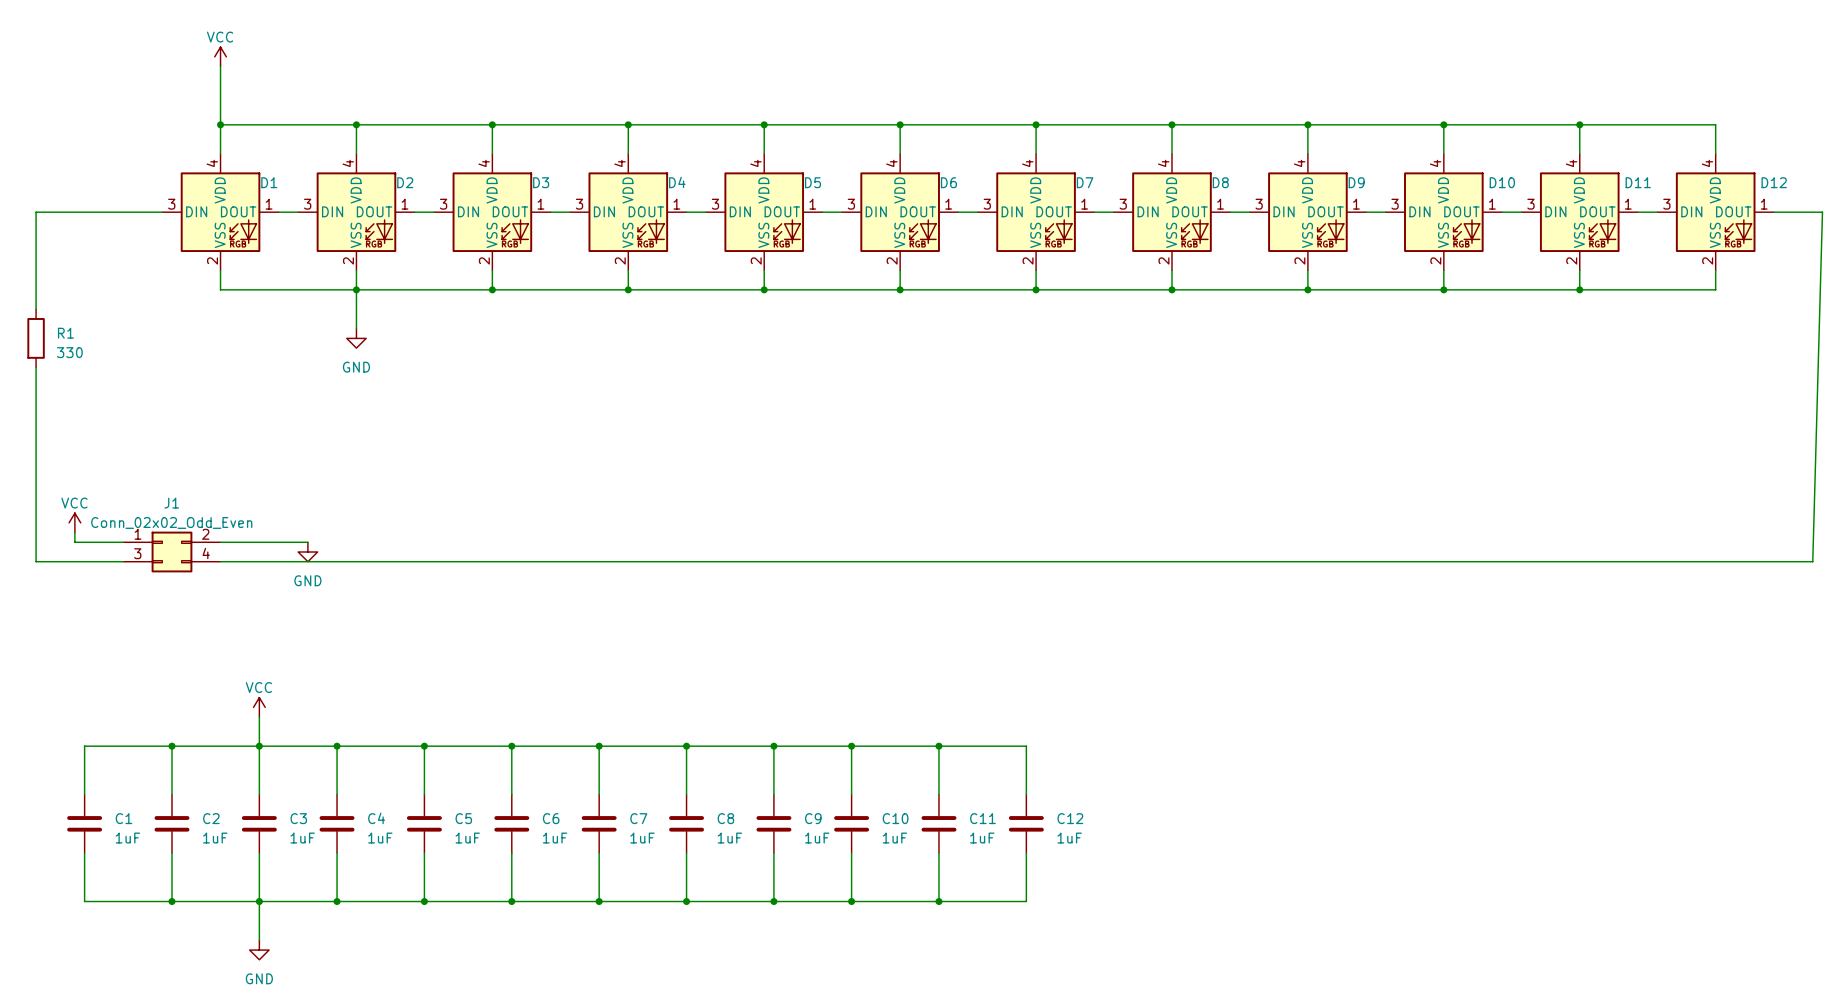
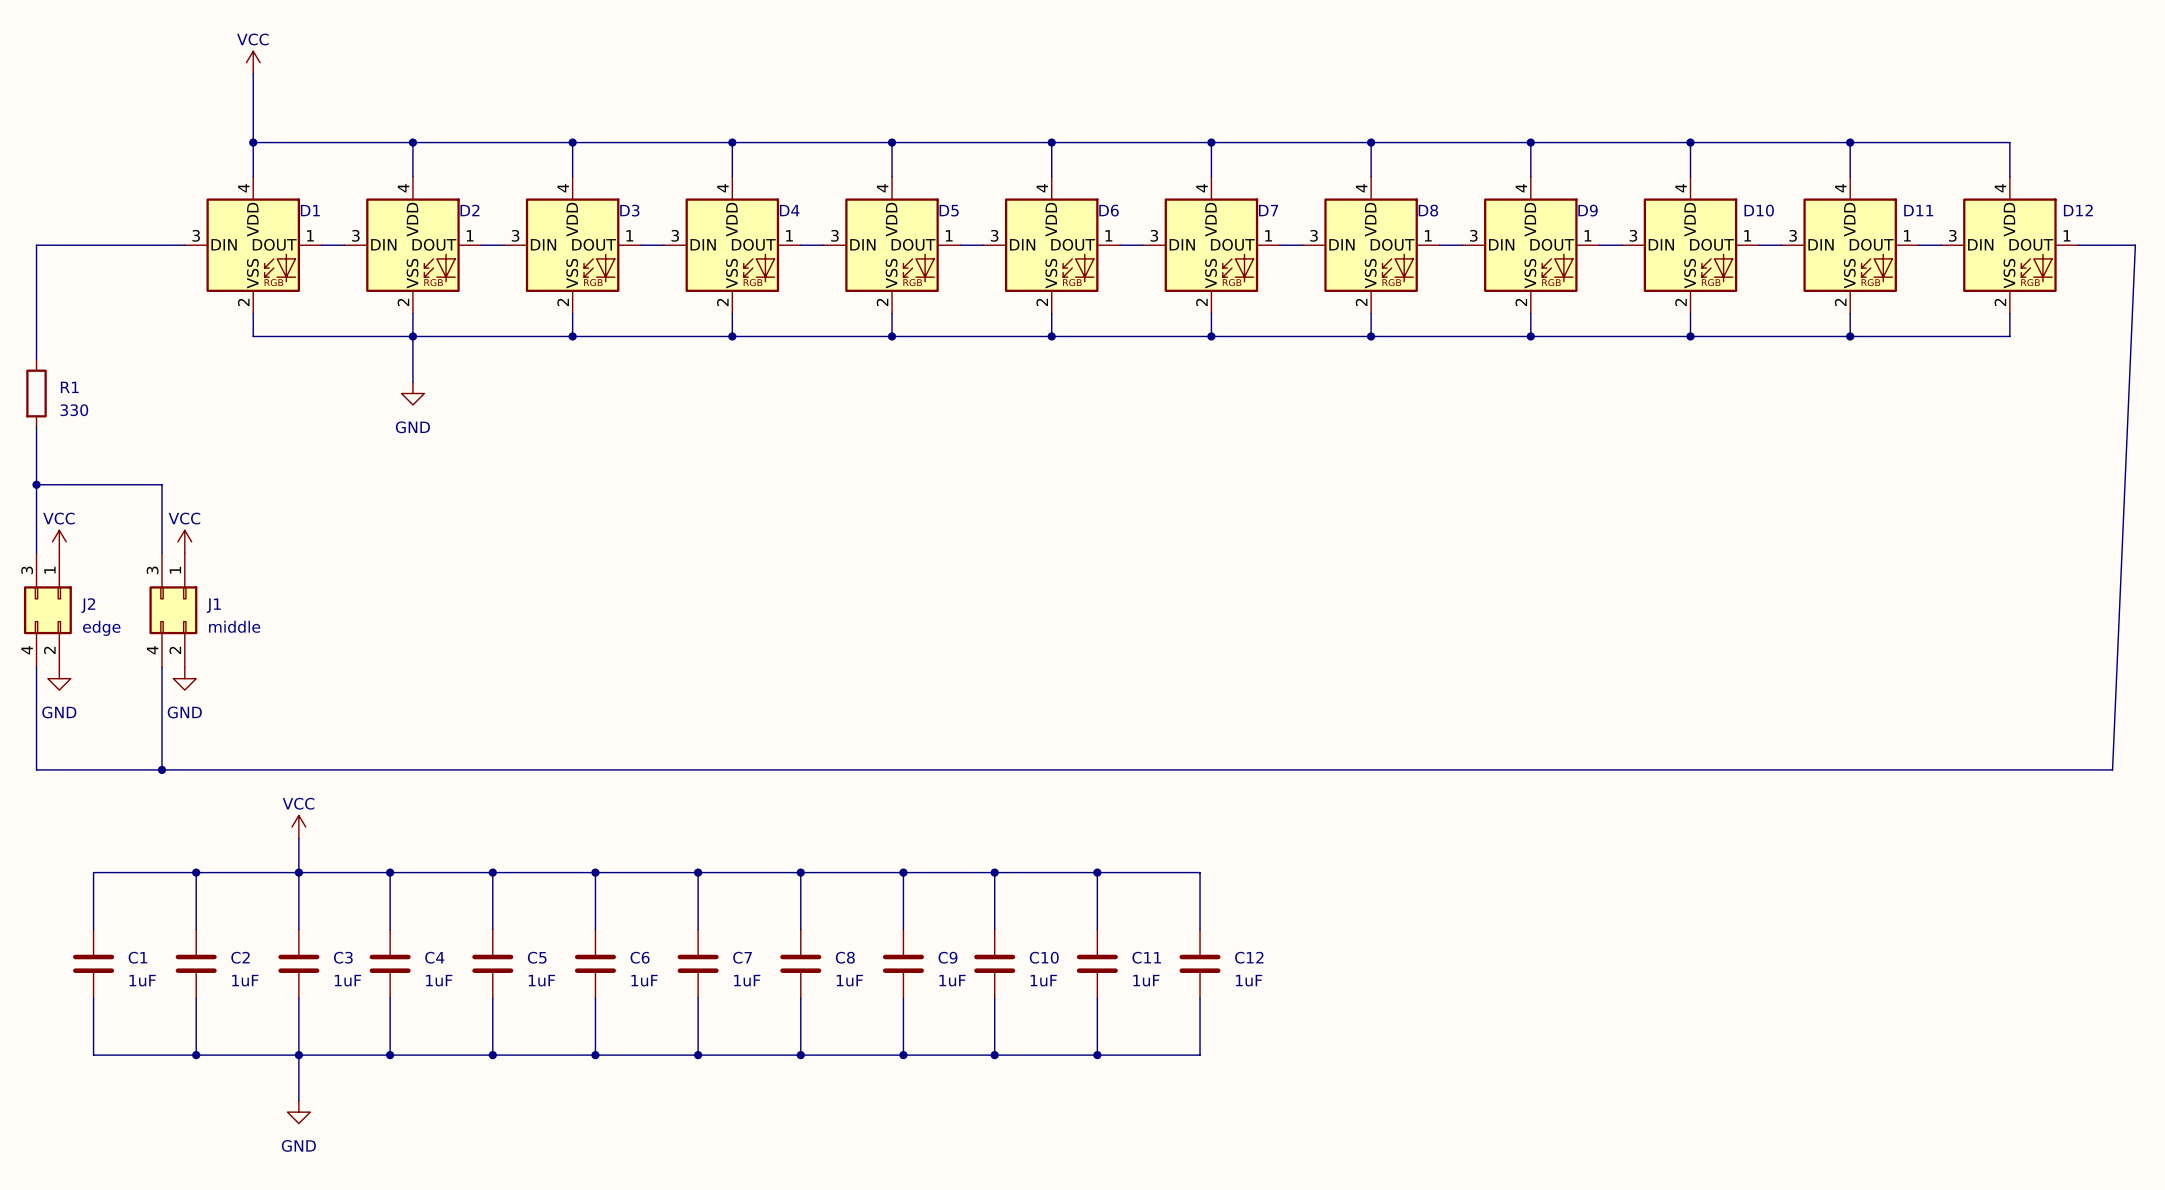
wire: (1822, 212) (1812, 561) (220, 561) -> (2135, 245) (2112, 769) (36, 769) (36, 667)
wire: none -> (36, 484) (161, 484) (161, 553)
junction: none -> (36, 484)
power symbol: none -> VCC (59, 541)
power symbol: none -> VCC (184, 541)
wire: (36, 474) (36, 561) (123, 561) -> none
J2: none -> edge (47, 610)
power symbol: VCC (74, 522) -> none
J1 value: Conn_02x02_Odd_Even (171, 522) -> middle (234, 626)
wire: (74, 532) (74, 542) (123, 542) -> none
wire: (220, 542) (307, 542) -> none
J1 rotation: 0° (171, 552) -> 90° clockwise (173, 610)
power symbol: GND (307, 552) -> none
wire: none -> (161, 667) (161, 769)
power symbol: none -> GND (59, 678)
power symbol: none -> GND (184, 678)
junction: none -> (161, 769)

